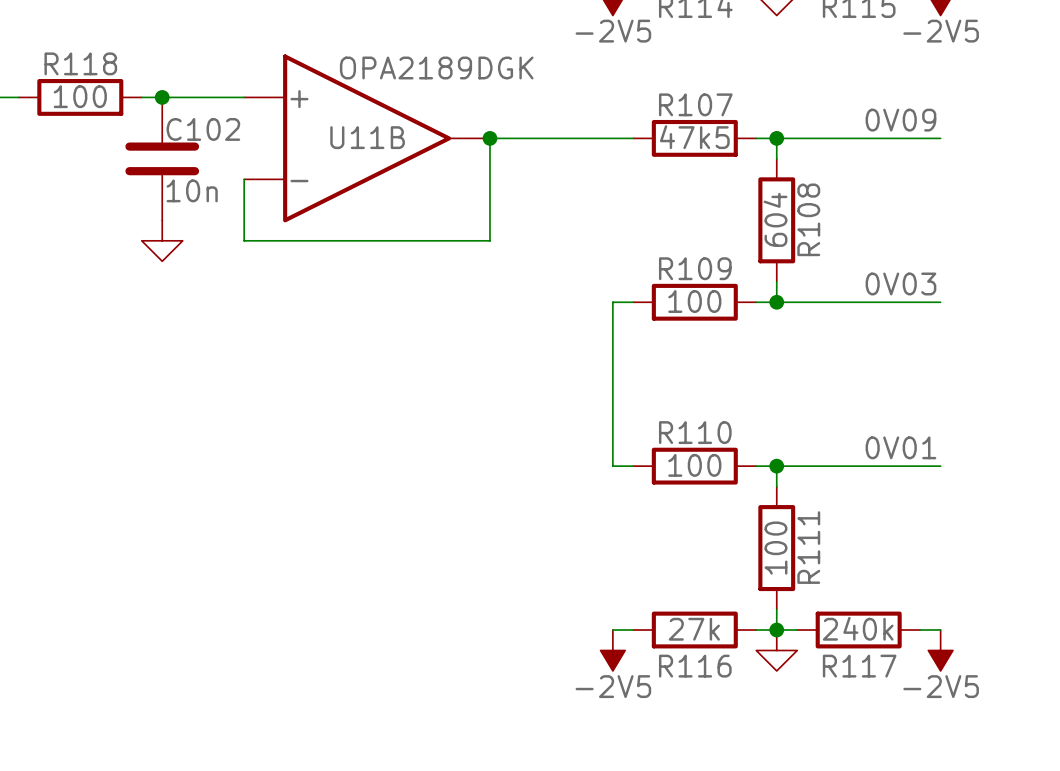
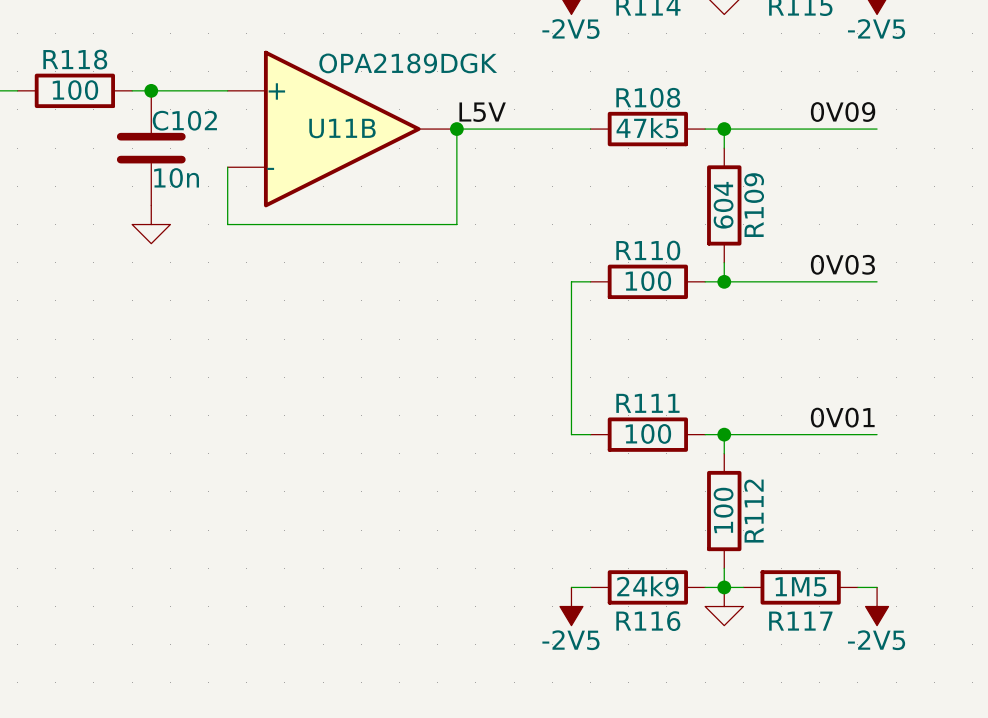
R107 name: R107 (695, 104) -> R108 (648, 97)
label: none -> L5V (482, 112)
R108 name: R108 (808, 219) -> R109 (754, 205)
R109 name: R109 (695, 268) -> R110 (648, 250)
R110 name: R110 (695, 432) -> R111 (647, 403)
R111 name: R111 (808, 547) -> R112 (753, 511)
R117 value: 240k (858, 628) -> 1M5 (800, 586)
R116 value: 27k (694, 629) -> 24k9 (647, 586)

